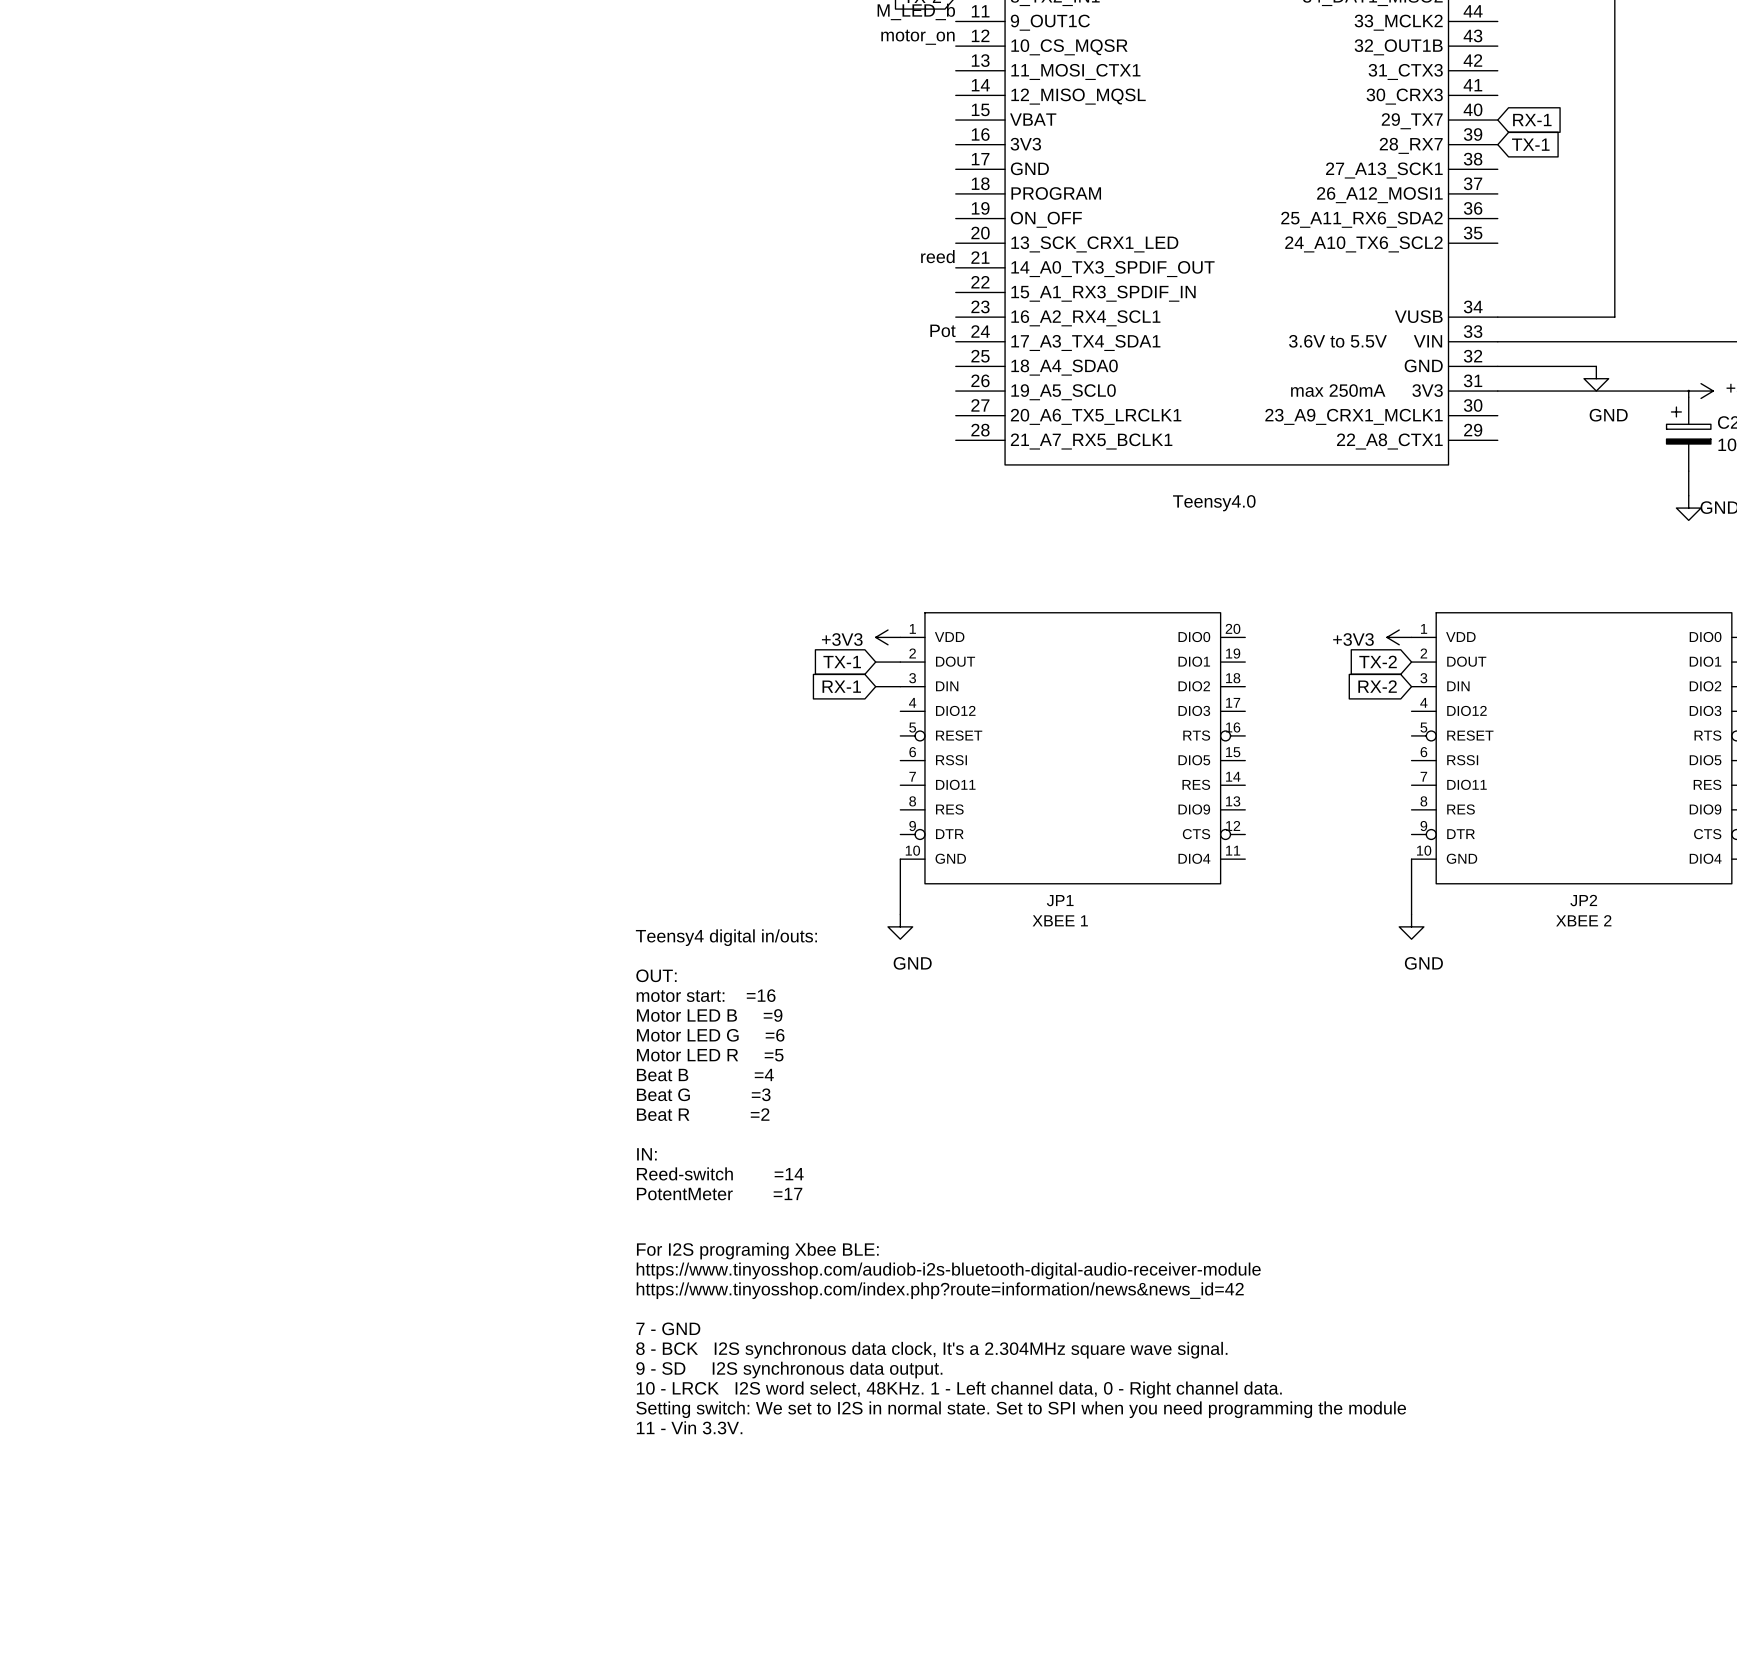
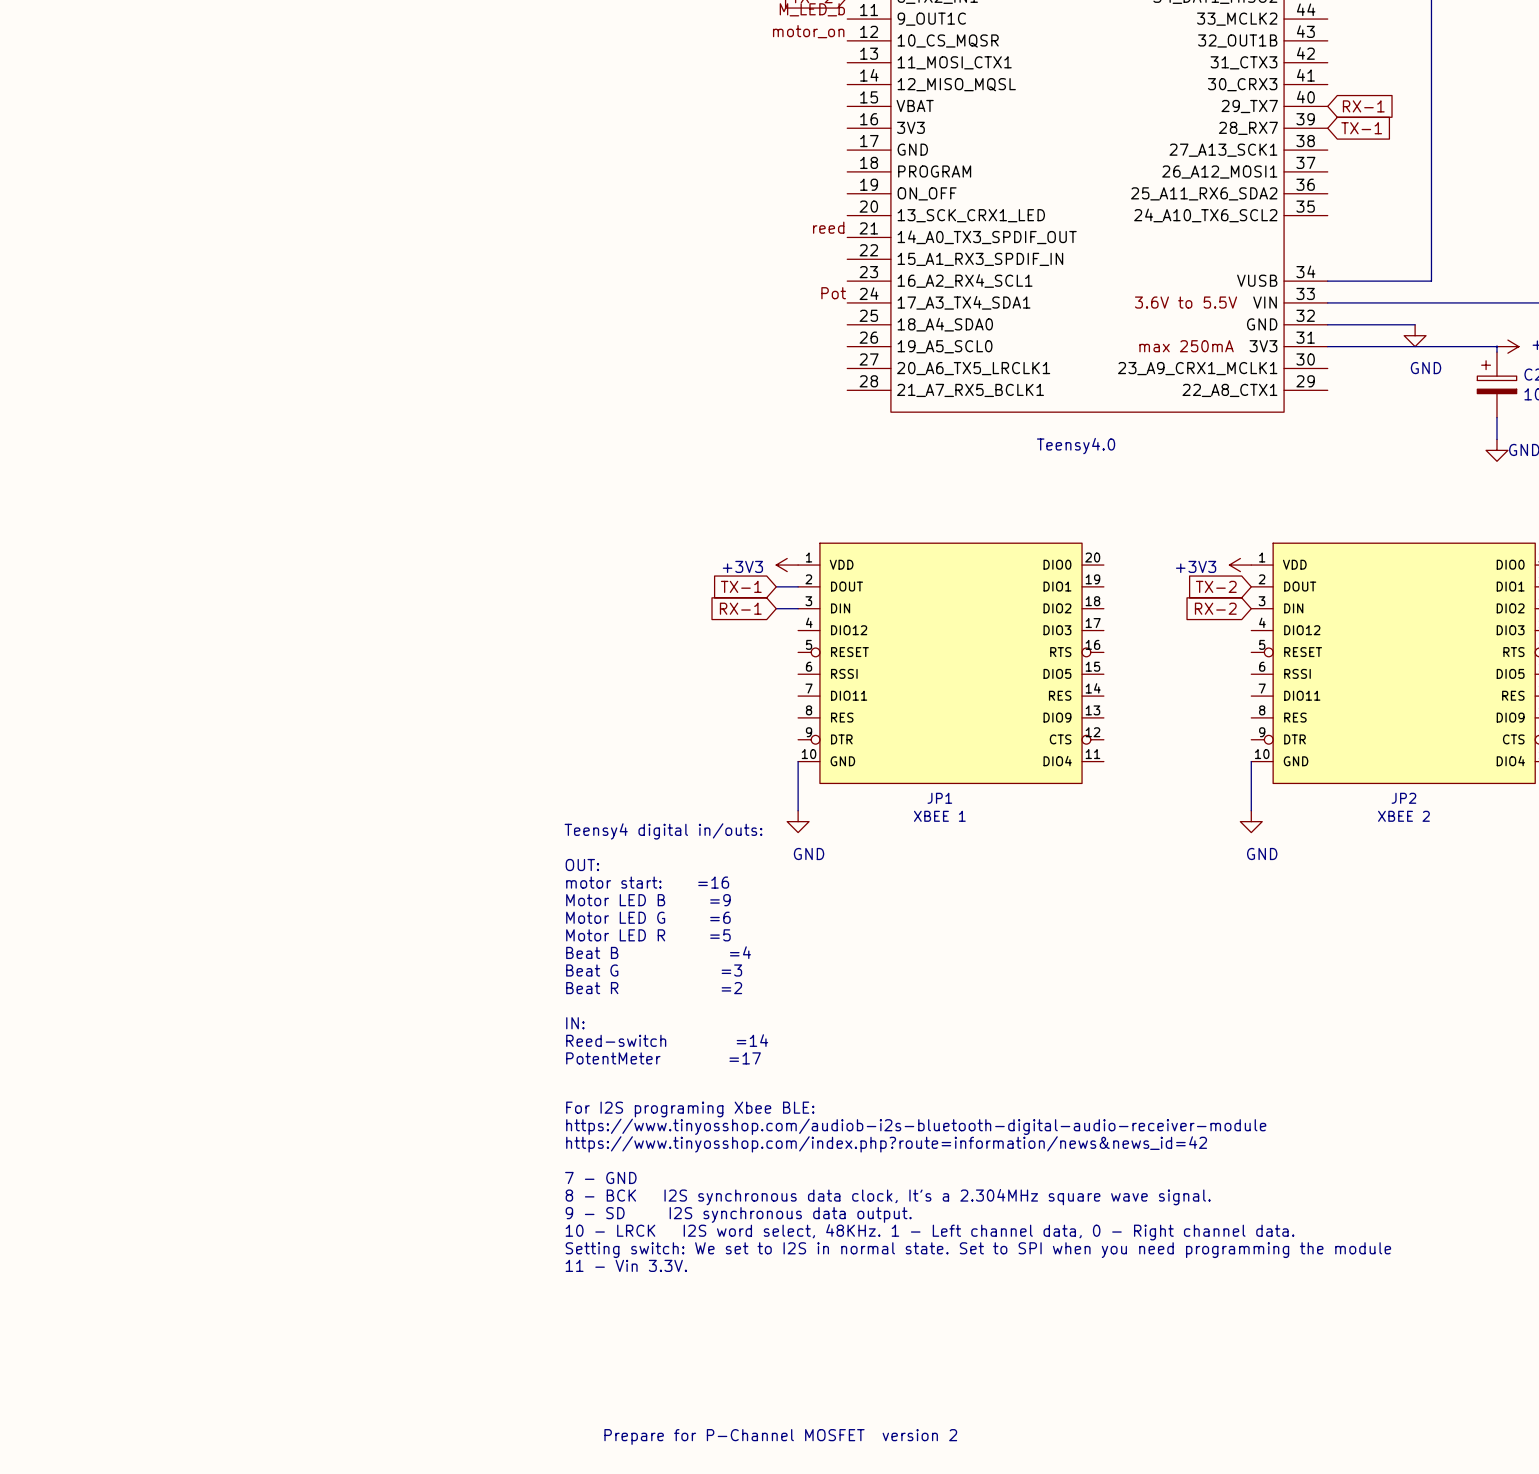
text: none -> Prepare for P-Channel MOSFET version 2 (780, 1436)

